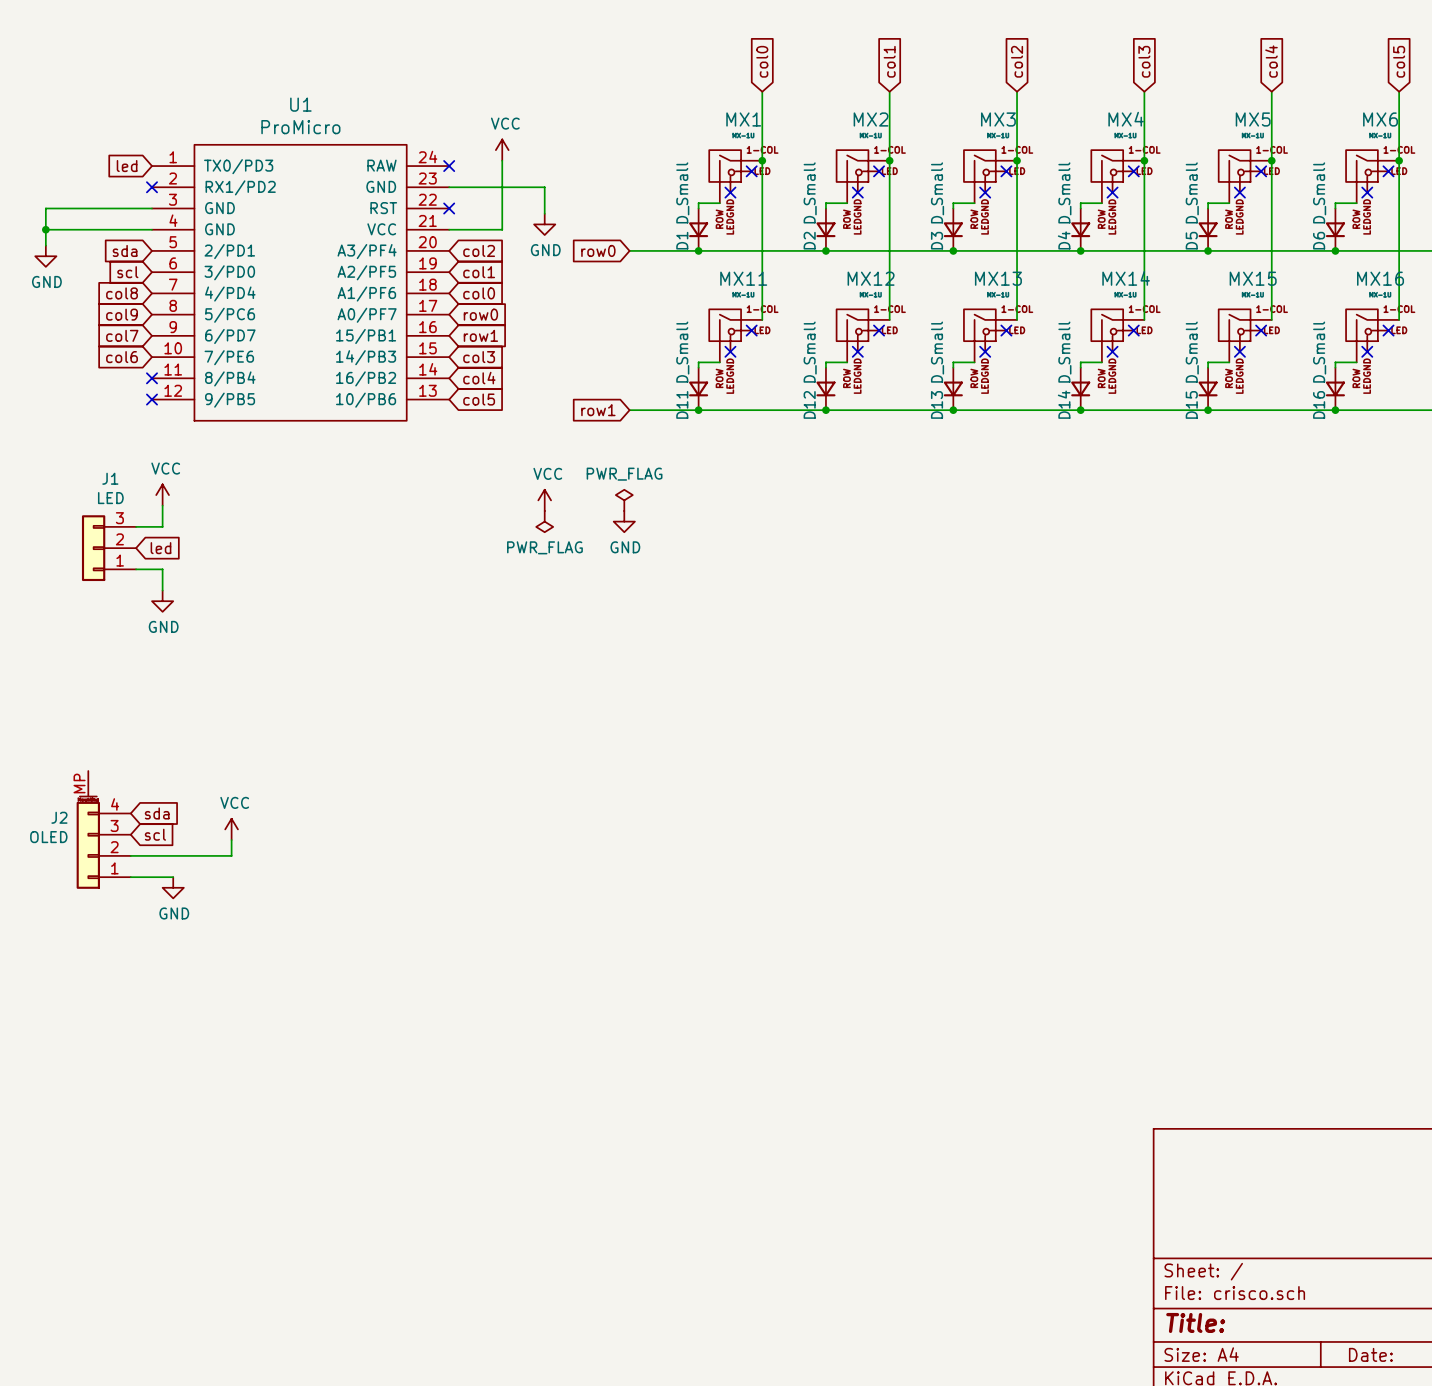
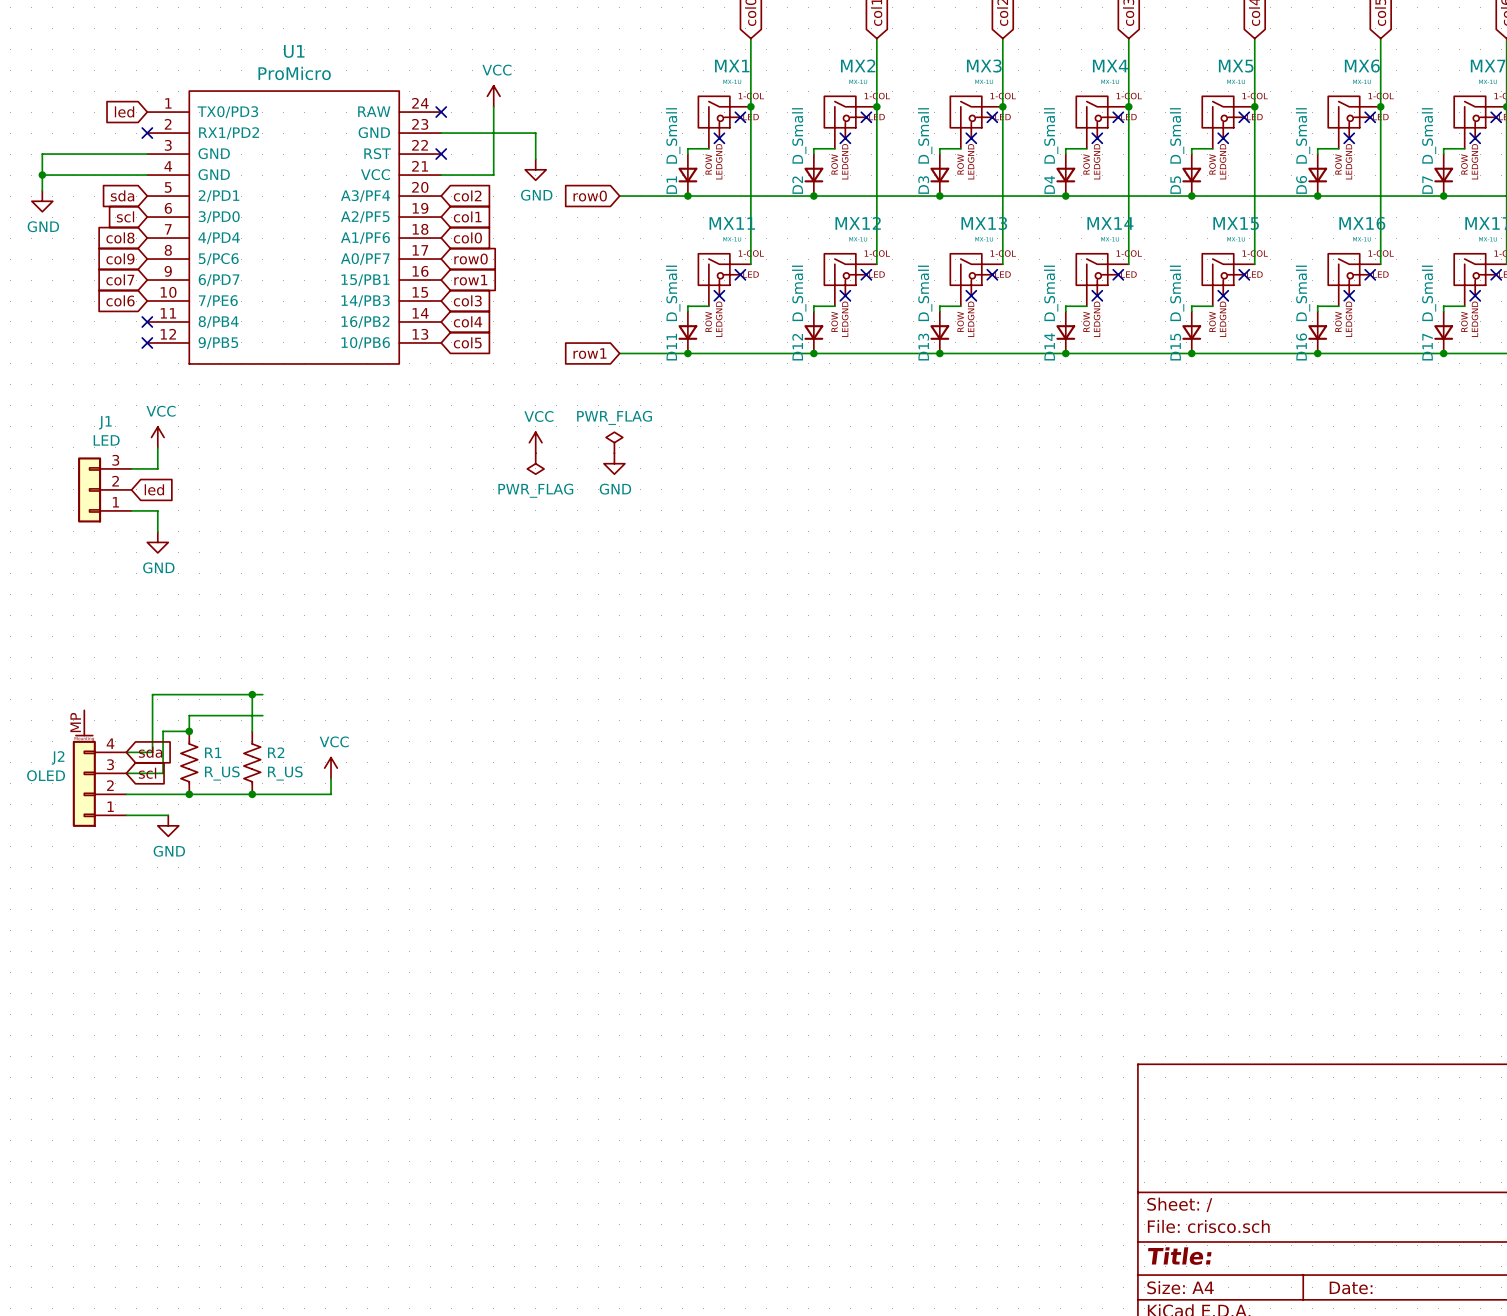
wire: none -> (252, 694) (252, 731)
junction: none -> (252, 694)
wire: none -> (262, 694) (152, 694) (152, 752) (126, 752)
wire: none -> (262, 715) (189, 715) (189, 731) (163, 731) (163, 773) (126, 773)
junction: none -> (189, 731)
R1: none -> R_US (189, 762)
R2: none -> R_US (252, 762)
power symbol position: VCC (231, 829) -> VCC (331, 768)
wire: (231, 840) (231, 855) -> (331, 778) (331, 794) (226, 794)
junction: none -> (189, 794)
junction: none -> (252, 794)

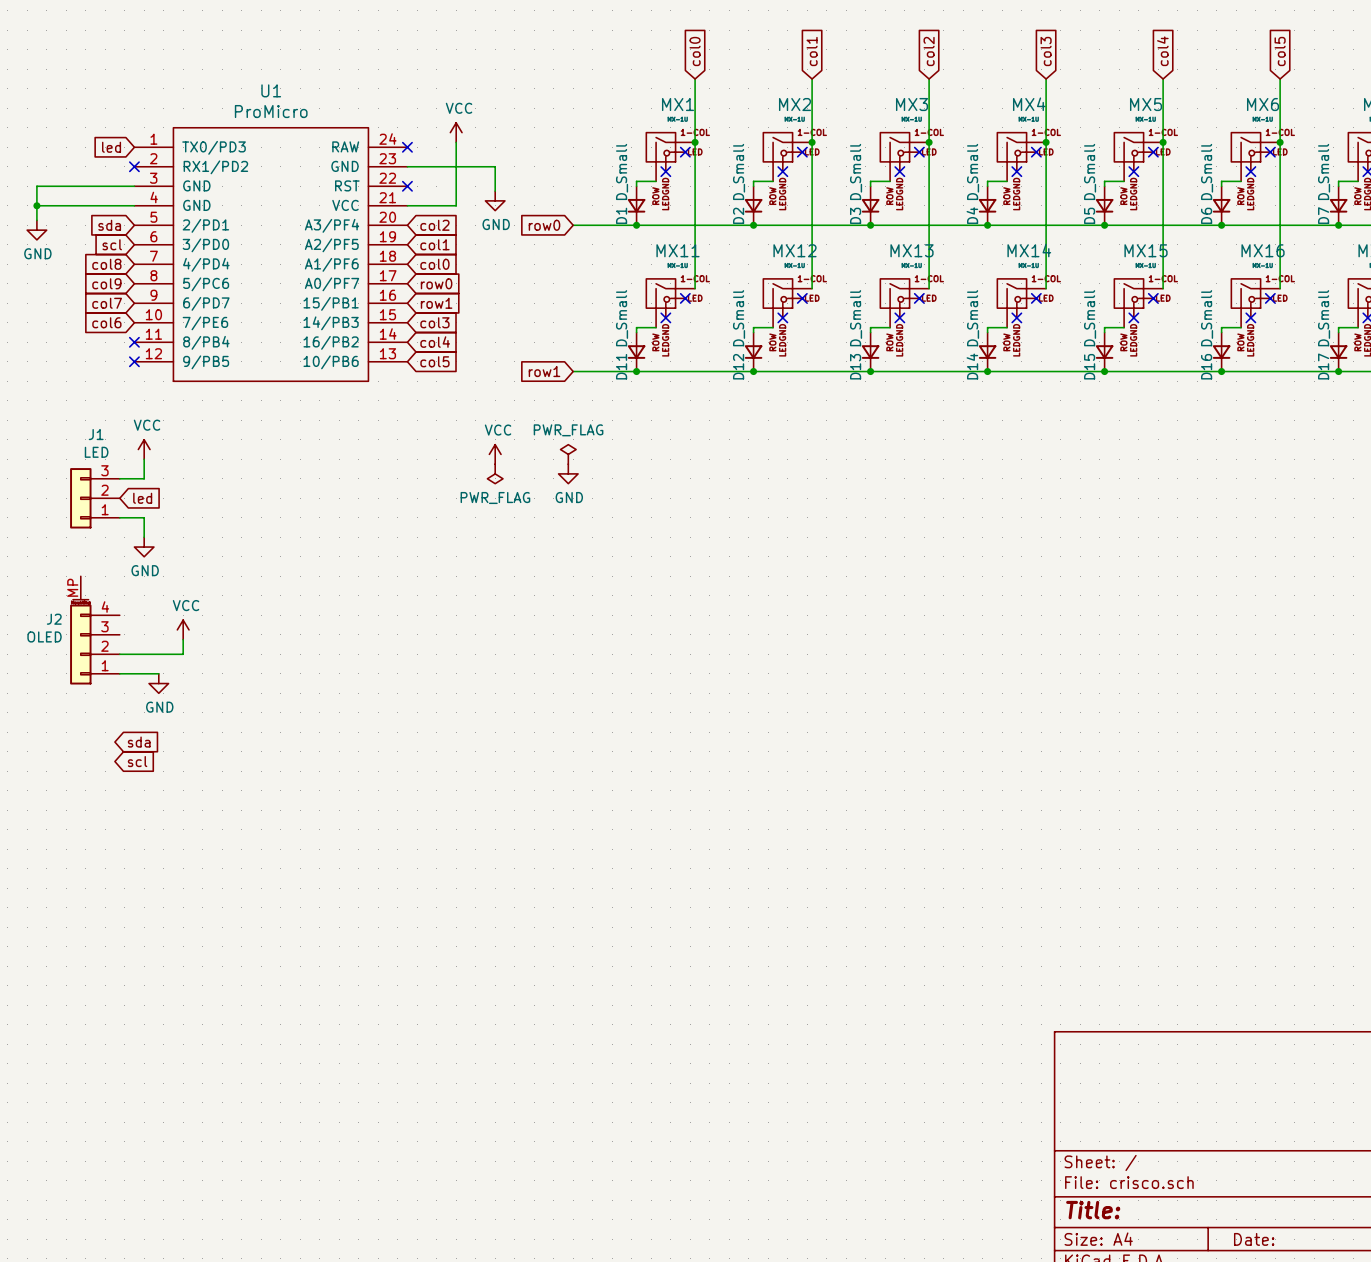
wire: none -> (183, 639) (183, 654) (119, 654)
wire: (252, 694) (252, 731) -> none
junction: (252, 694) -> none
wire: (262, 694) (152, 694) (152, 752) (126, 752) -> none
wire: (262, 715) (189, 715) (189, 731) (163, 731) (163, 773) (126, 773) -> none
junction: (189, 731) -> none
R1: R_US (189, 762) -> none
R2: R_US (252, 762) -> none
J2 position: (99, 768) -> (94, 630)
power symbol position: VCC (331, 768) -> VCC (183, 629)
wire: (331, 778) (331, 794) (126, 794) -> none
junction: (189, 794) -> none
junction: (252, 794) -> none
wire: (126, 815) (168, 815) -> (119, 673) (158, 673)
power symbol position: GND (168, 825) -> GND (158, 683)

